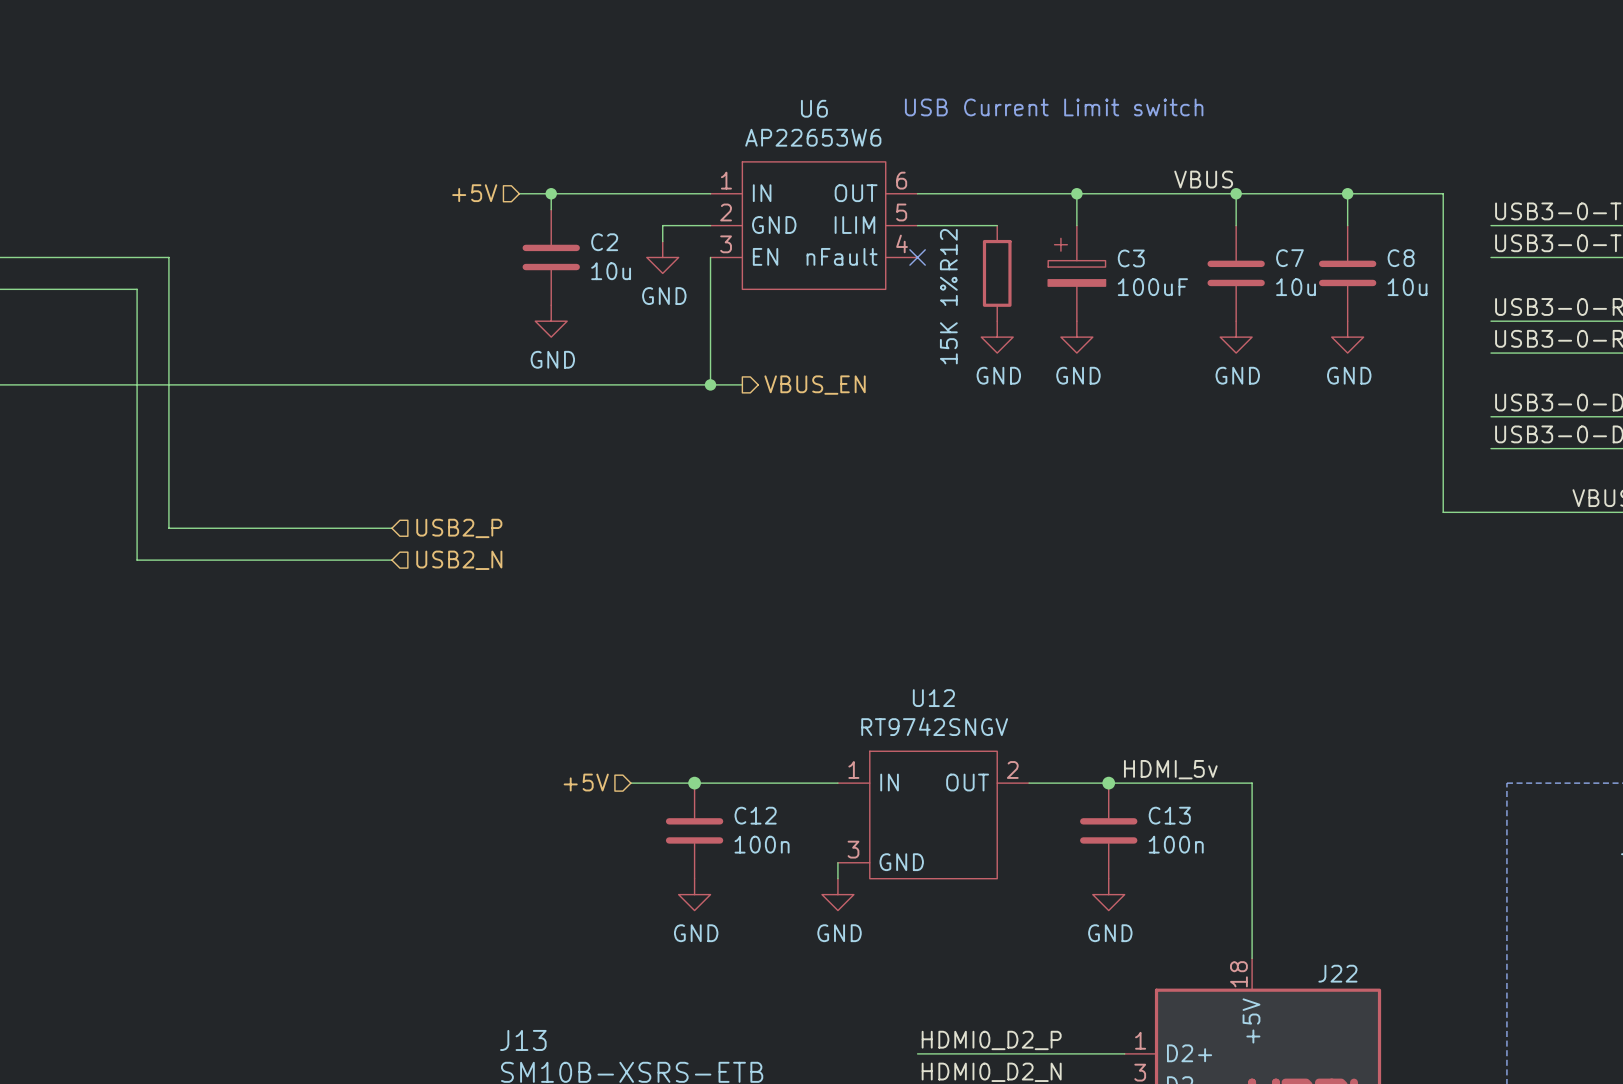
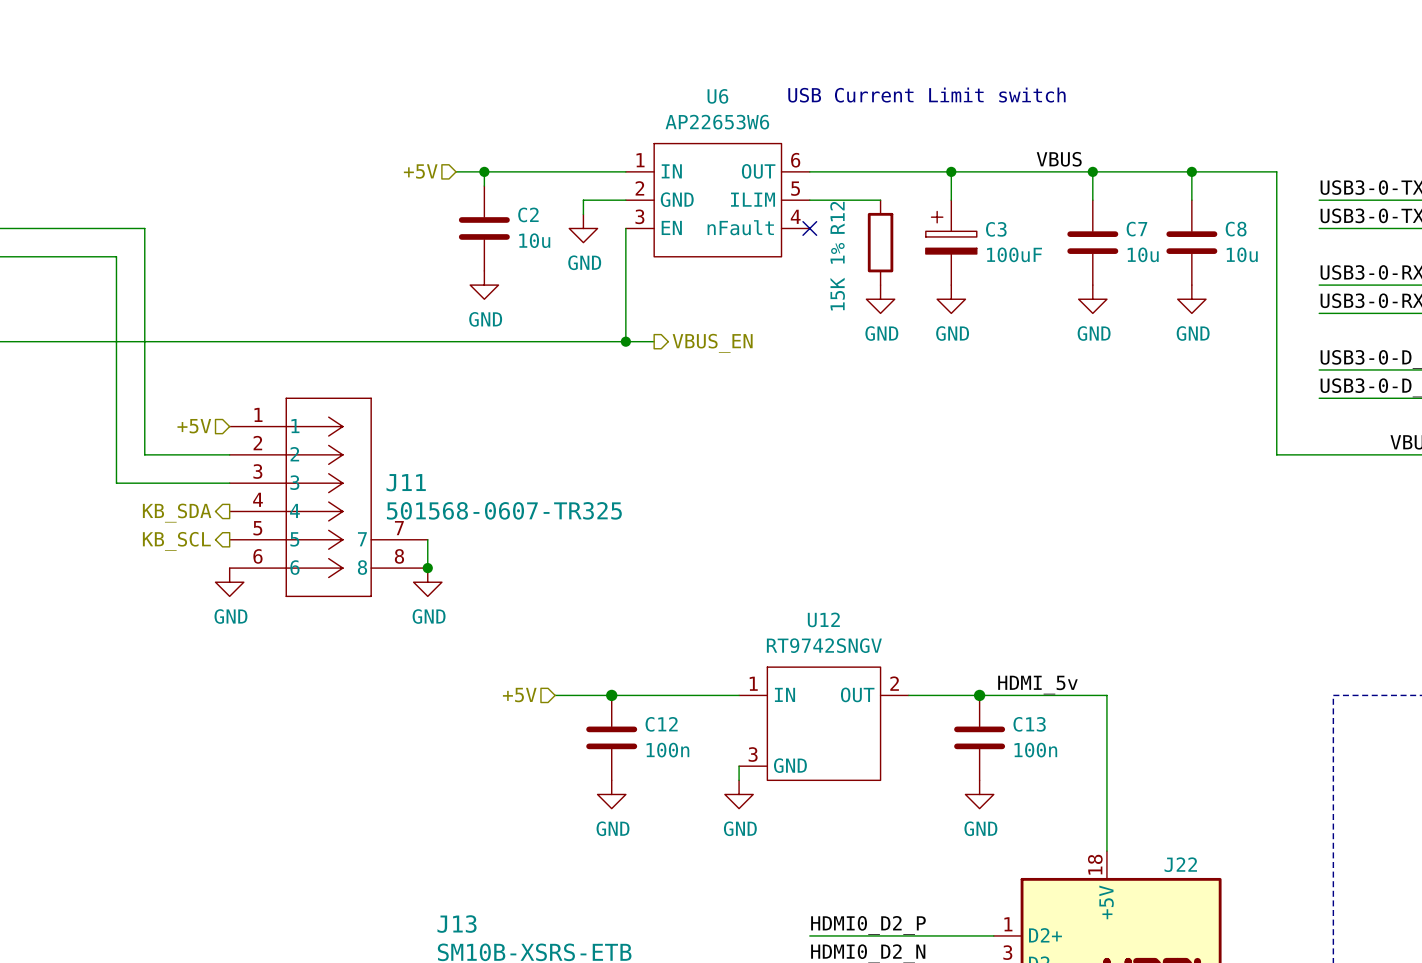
hierarchical label: none -> +5V (194, 426)
wire: (168, 512) (168, 528) (391, 528) -> (144, 454) (229, 454)
hierarchical label: USB2_P (459, 528) -> none
wire: (137, 544) (137, 560) (391, 560) -> (116, 483) (229, 483)
J11: none -> 501568-0607-TR325 (328, 497)
hierarchical label: USB2_N (459, 560) -> none
hierarchical label: none -> KB_SDA (177, 513)
wire: none -> (427, 539) (427, 568)
hierarchical label: none -> KB_SCL (176, 541)
junction: none -> (427, 568)
power symbol: none -> GND (229, 582)
power symbol: none -> GND (427, 582)

